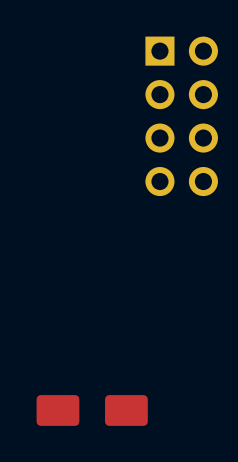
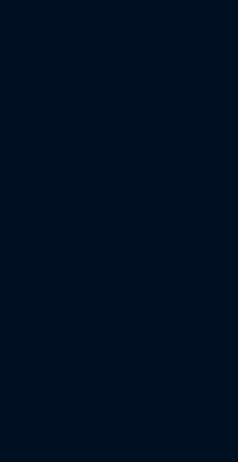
part: (181, 116) -> none
part: (92, 410) -> none

